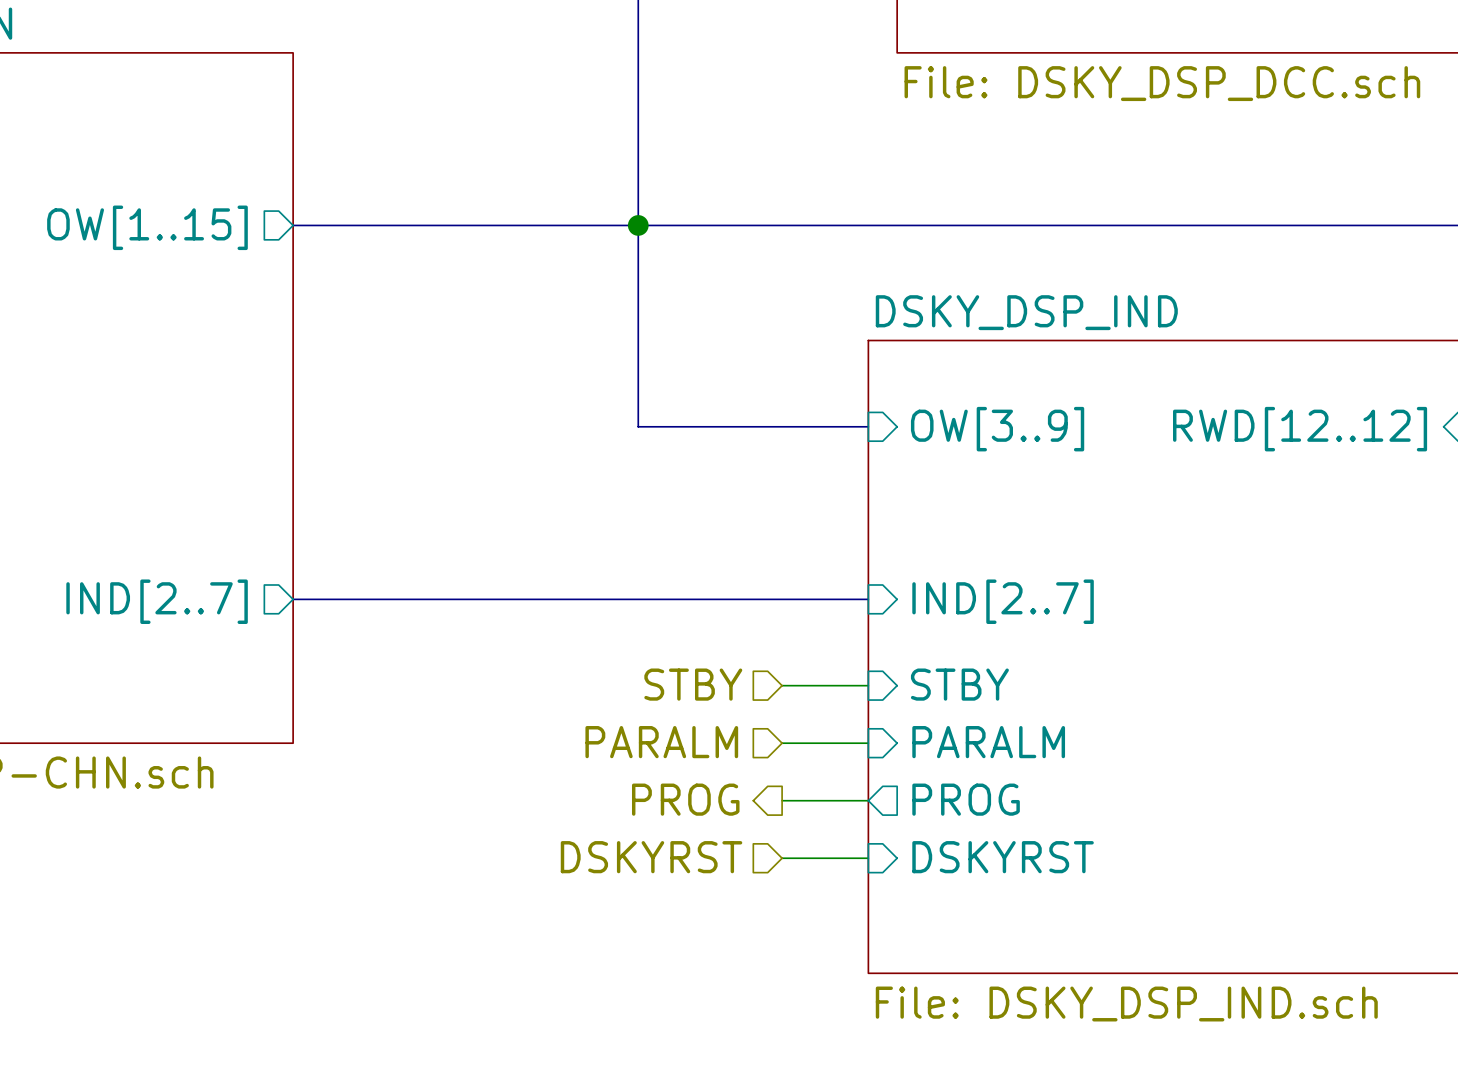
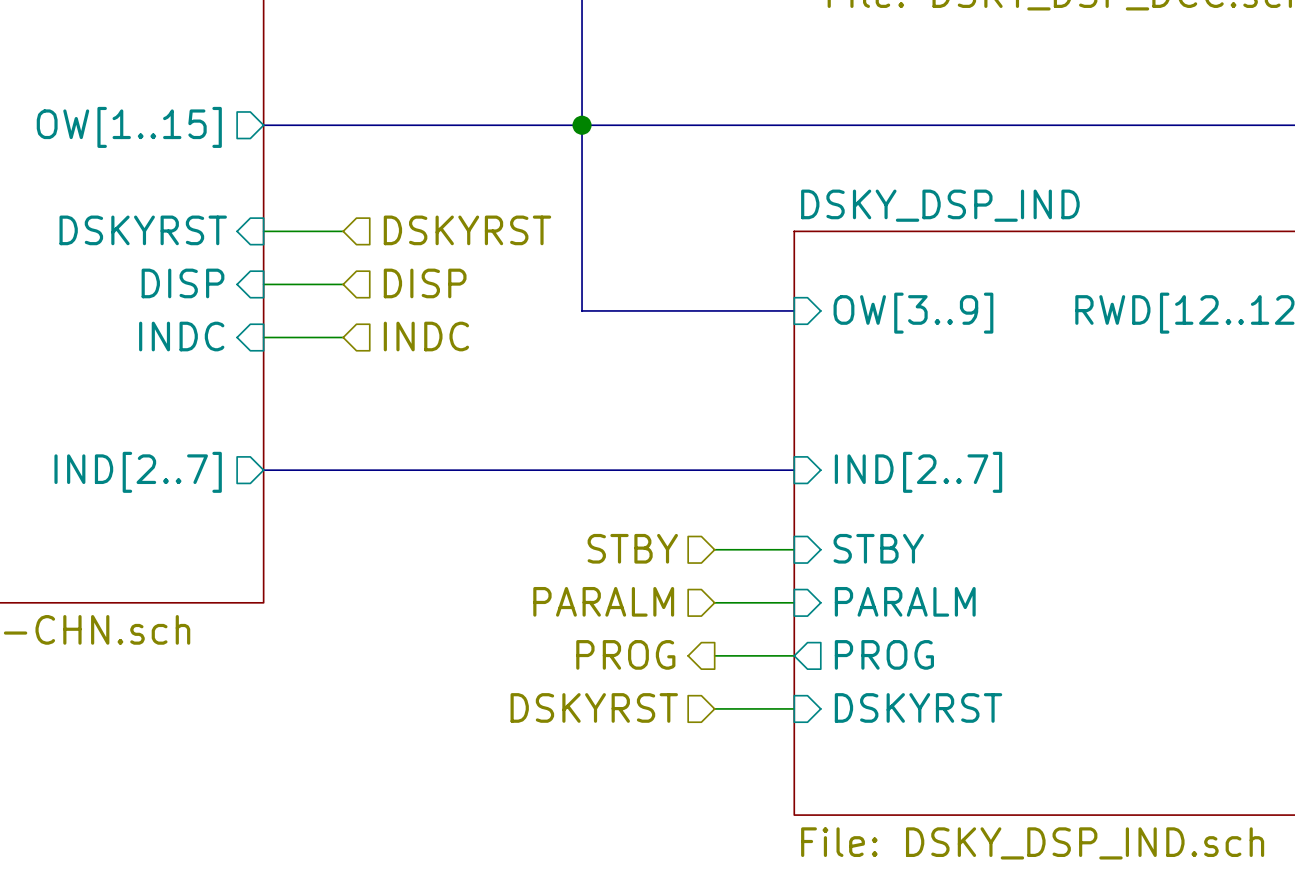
sheet pin: none -> DSKYRST (143, 230)
hierarchical label: none -> DSKYRST (467, 230)
wire: none -> (263, 231) (343, 231)
sheet pin: none -> DISP (182, 283)
hierarchical label: none -> DISP (425, 283)
wire: none -> (263, 284) (343, 284)
sheet pin: none -> INDC (181, 336)
hierarchical label: none -> INDC (426, 336)
wire: none -> (263, 337) (343, 337)

